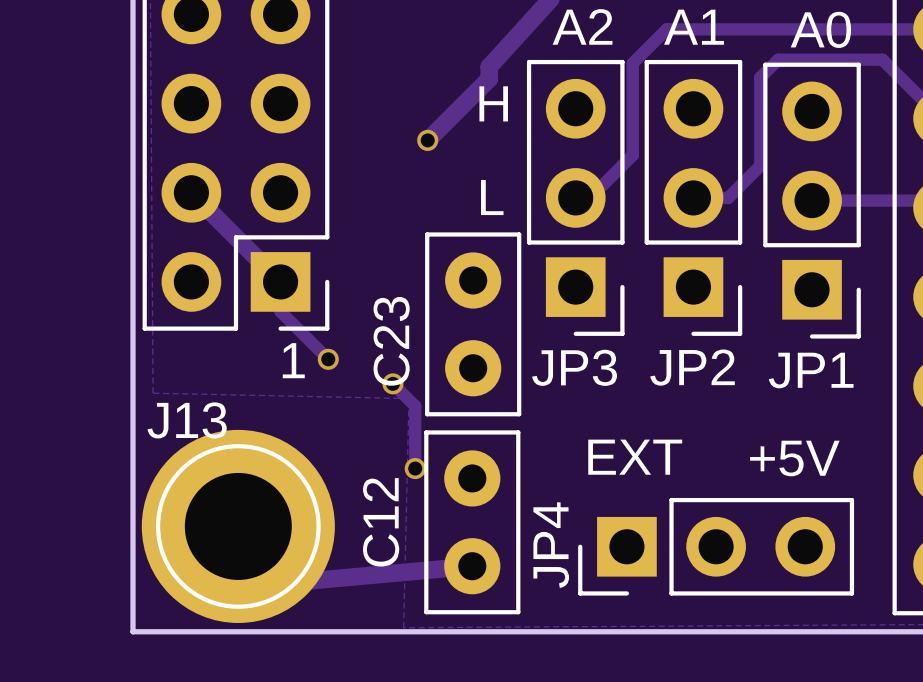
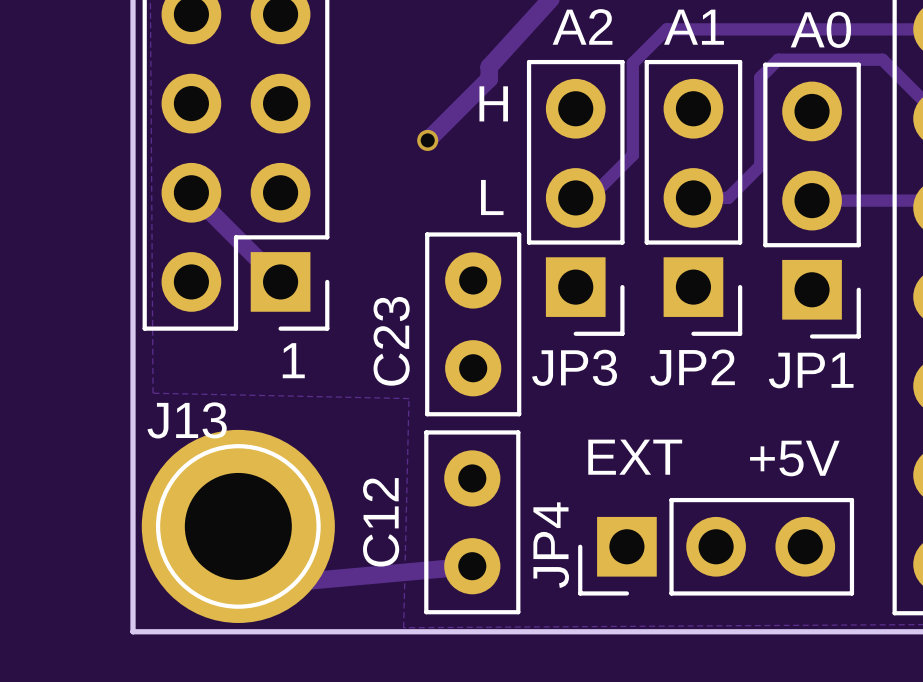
track: (280, 281) (280, 311) (328, 359) -> none
via: (328, 359) -> none
track: (392, 383) (415, 406) (415, 468) -> none
via: (392, 383) -> none
via: (415, 468) -> none

